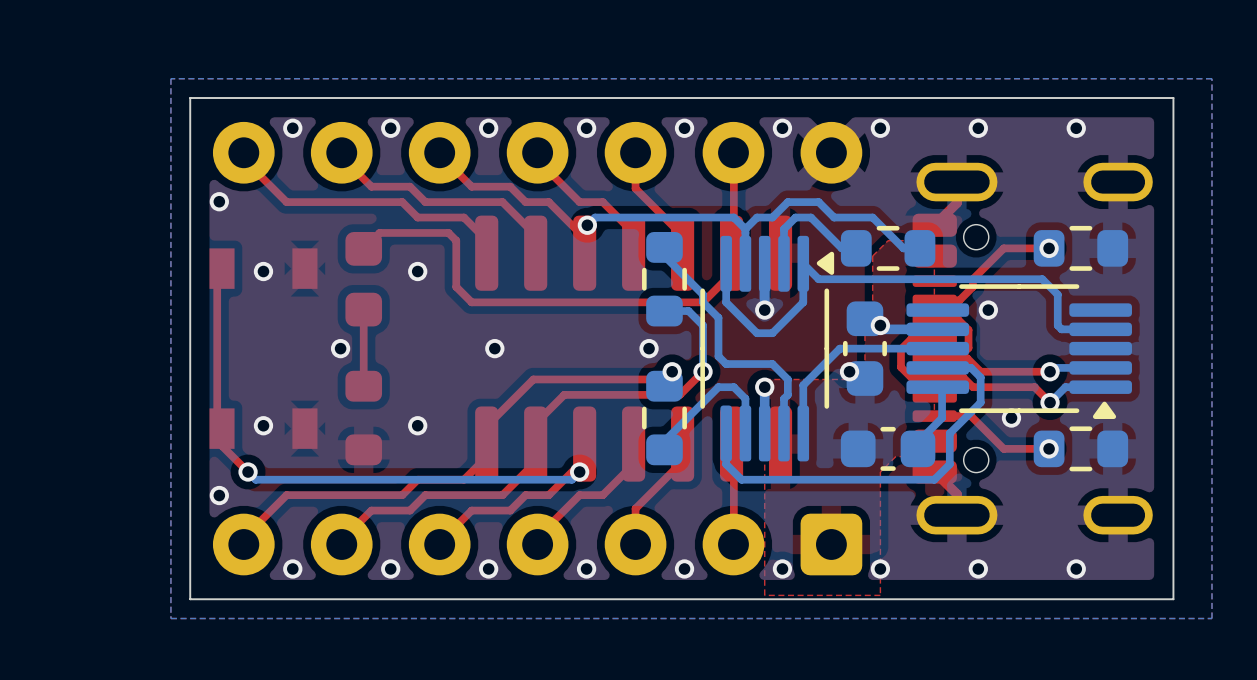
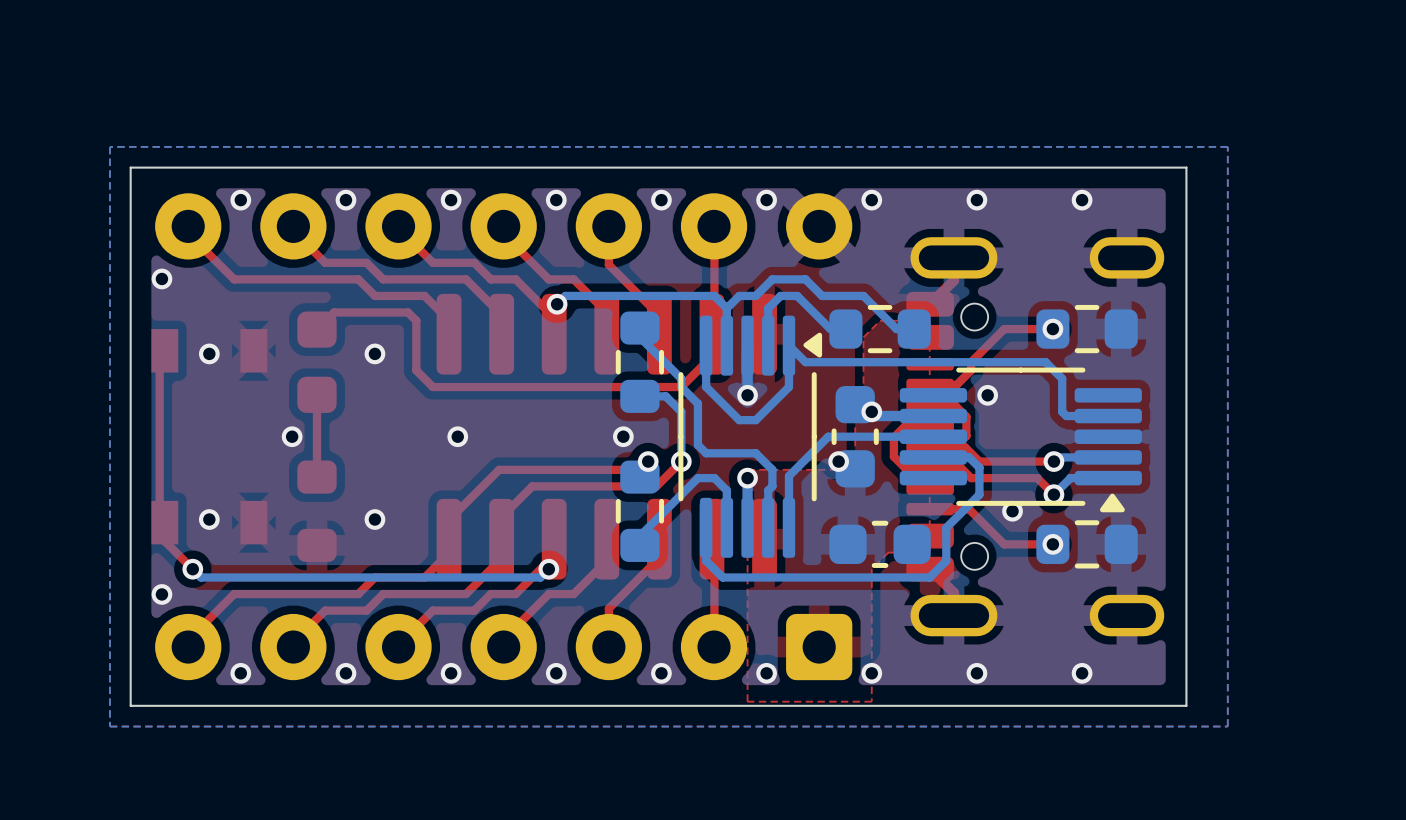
bottom track: (937, 387) (942, 391) (942, 418) (917, 442) (917, 448) -> none

